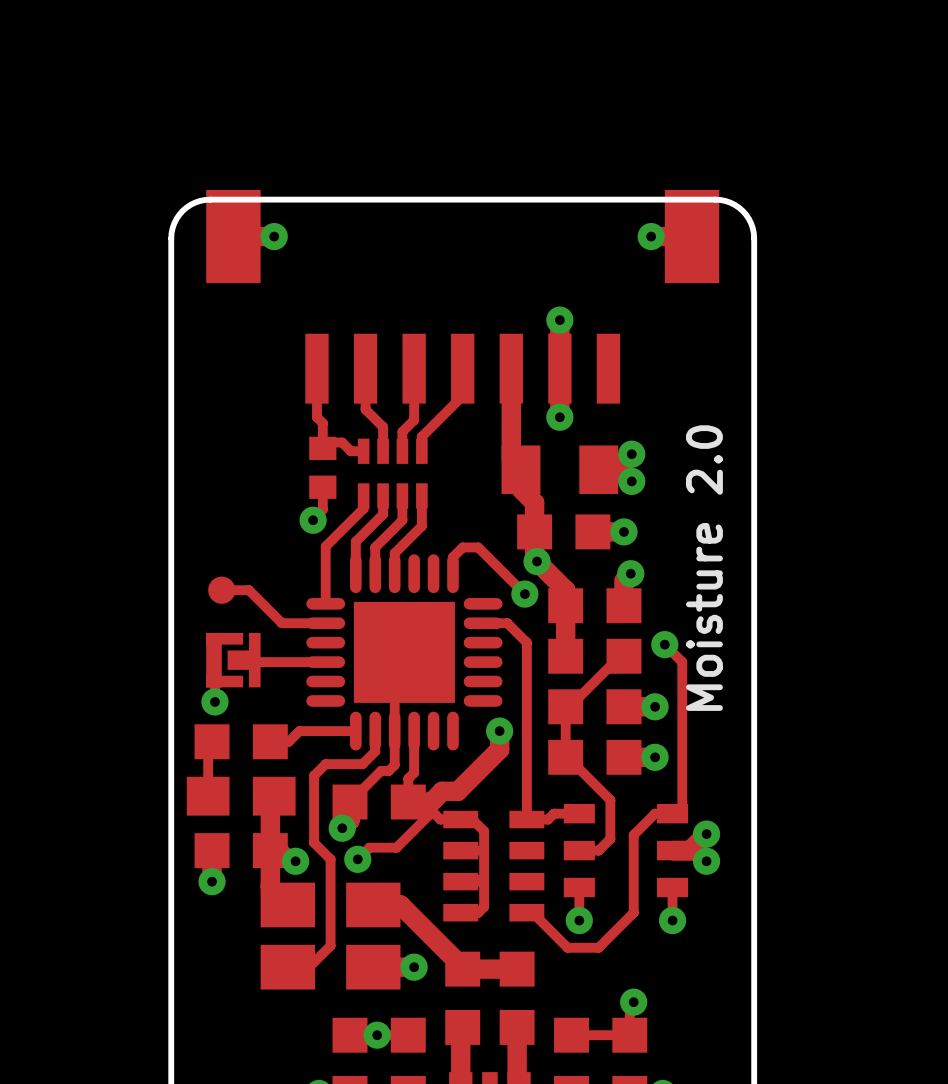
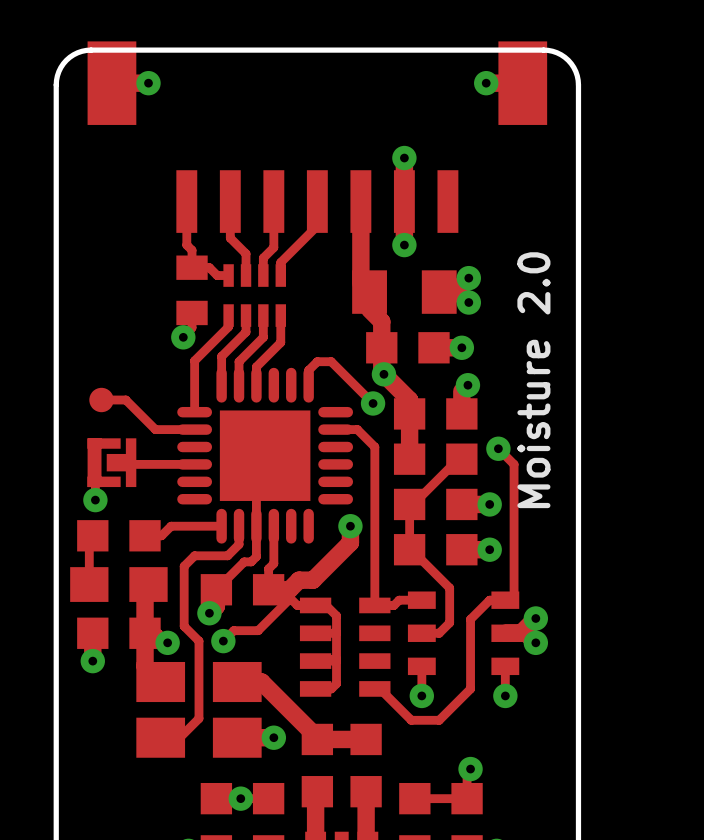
part footprint: [309, 436, 337, 499] -> [176, 255, 208, 326]

